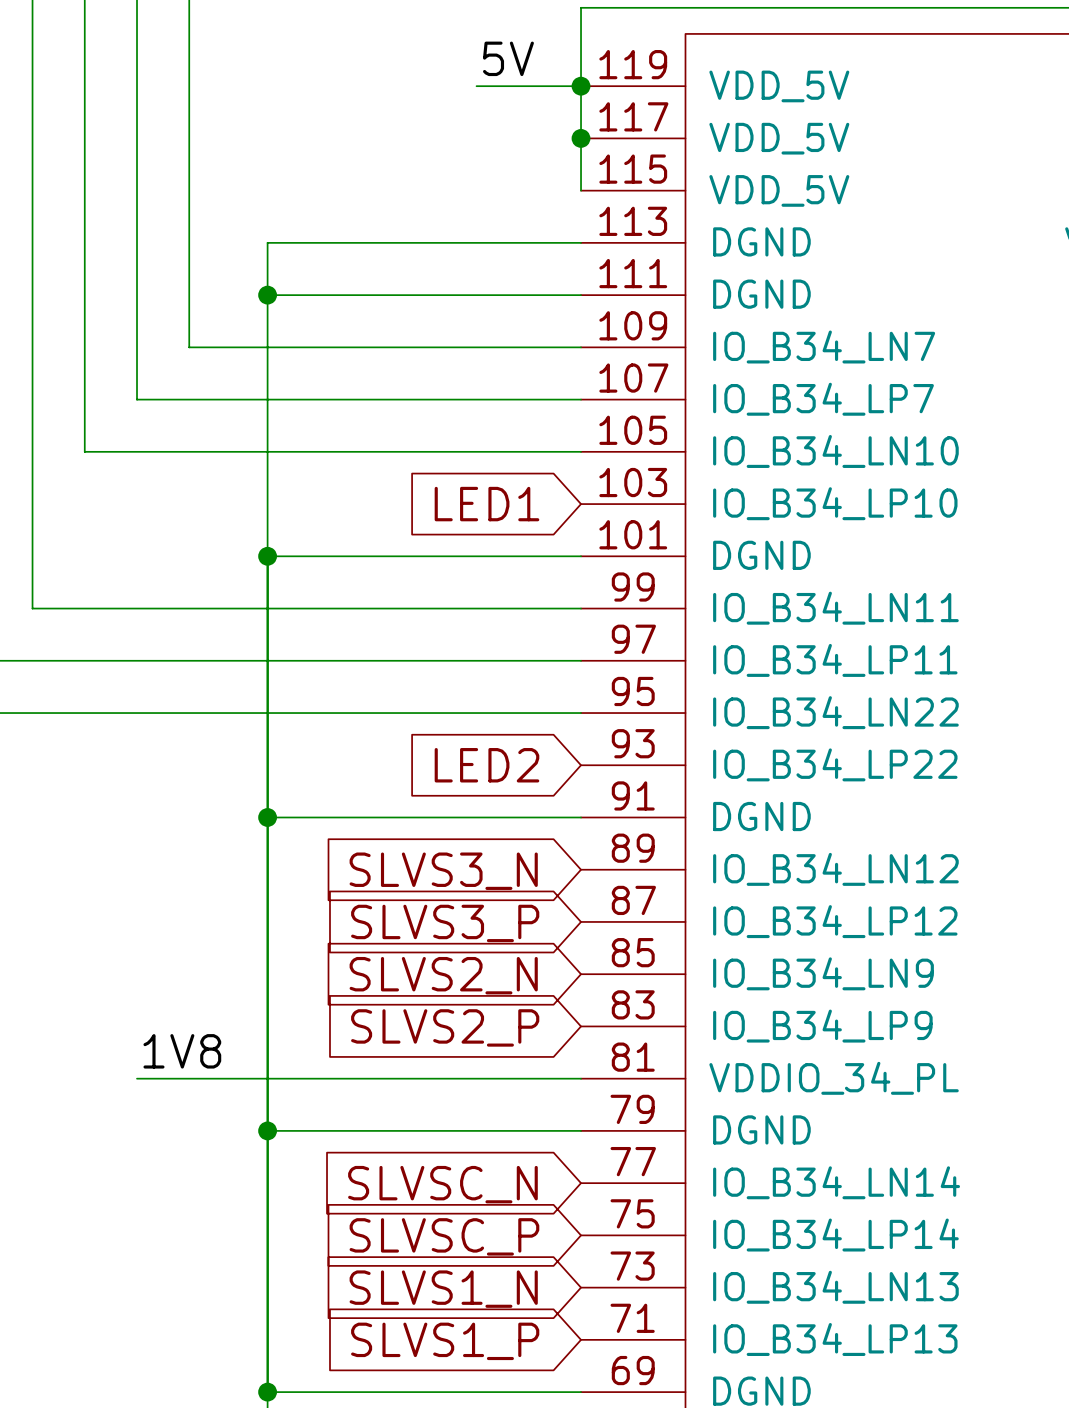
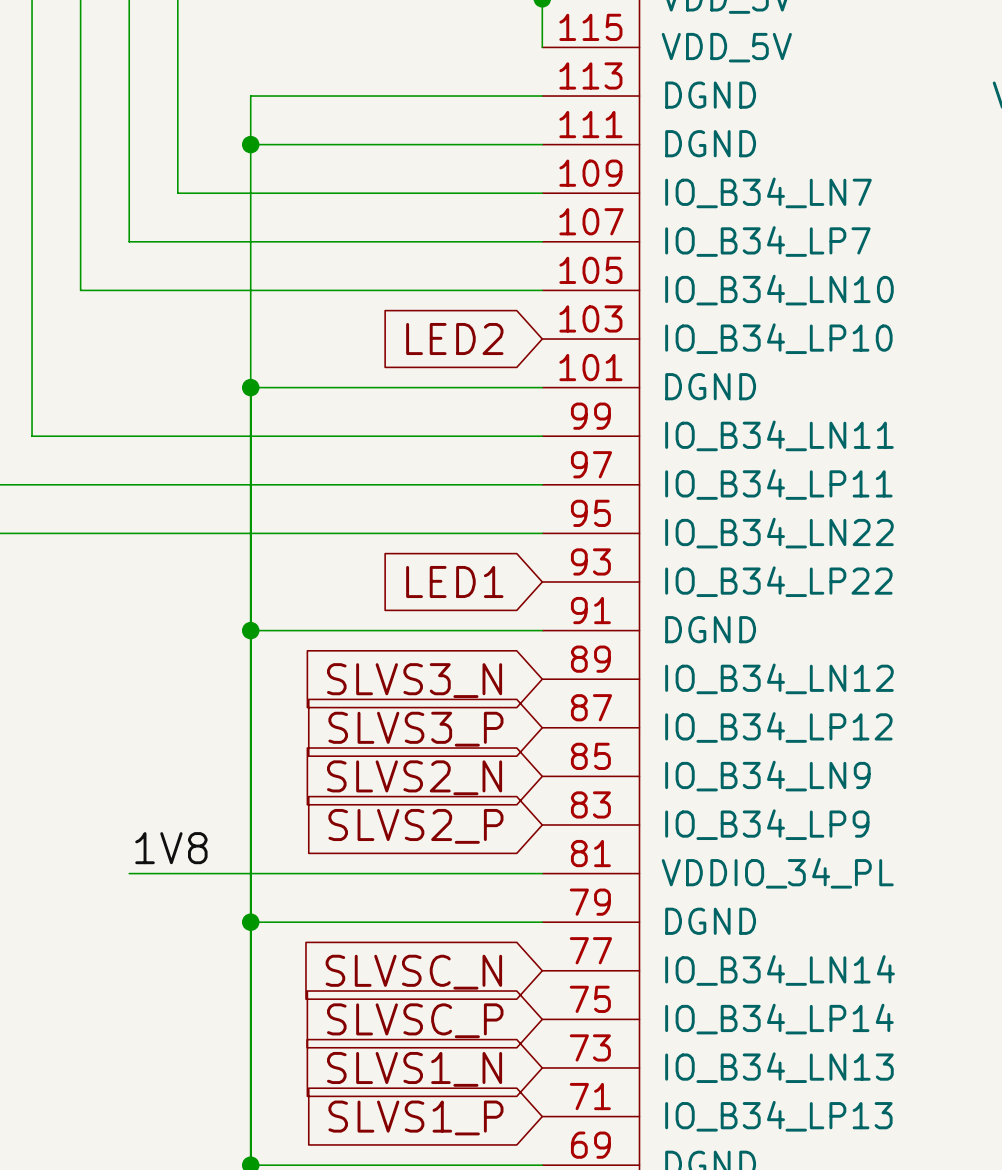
global label: LED1 (486, 504) -> LED2 (454, 339)
global label: LED2 (486, 765) -> LED1 (454, 582)

